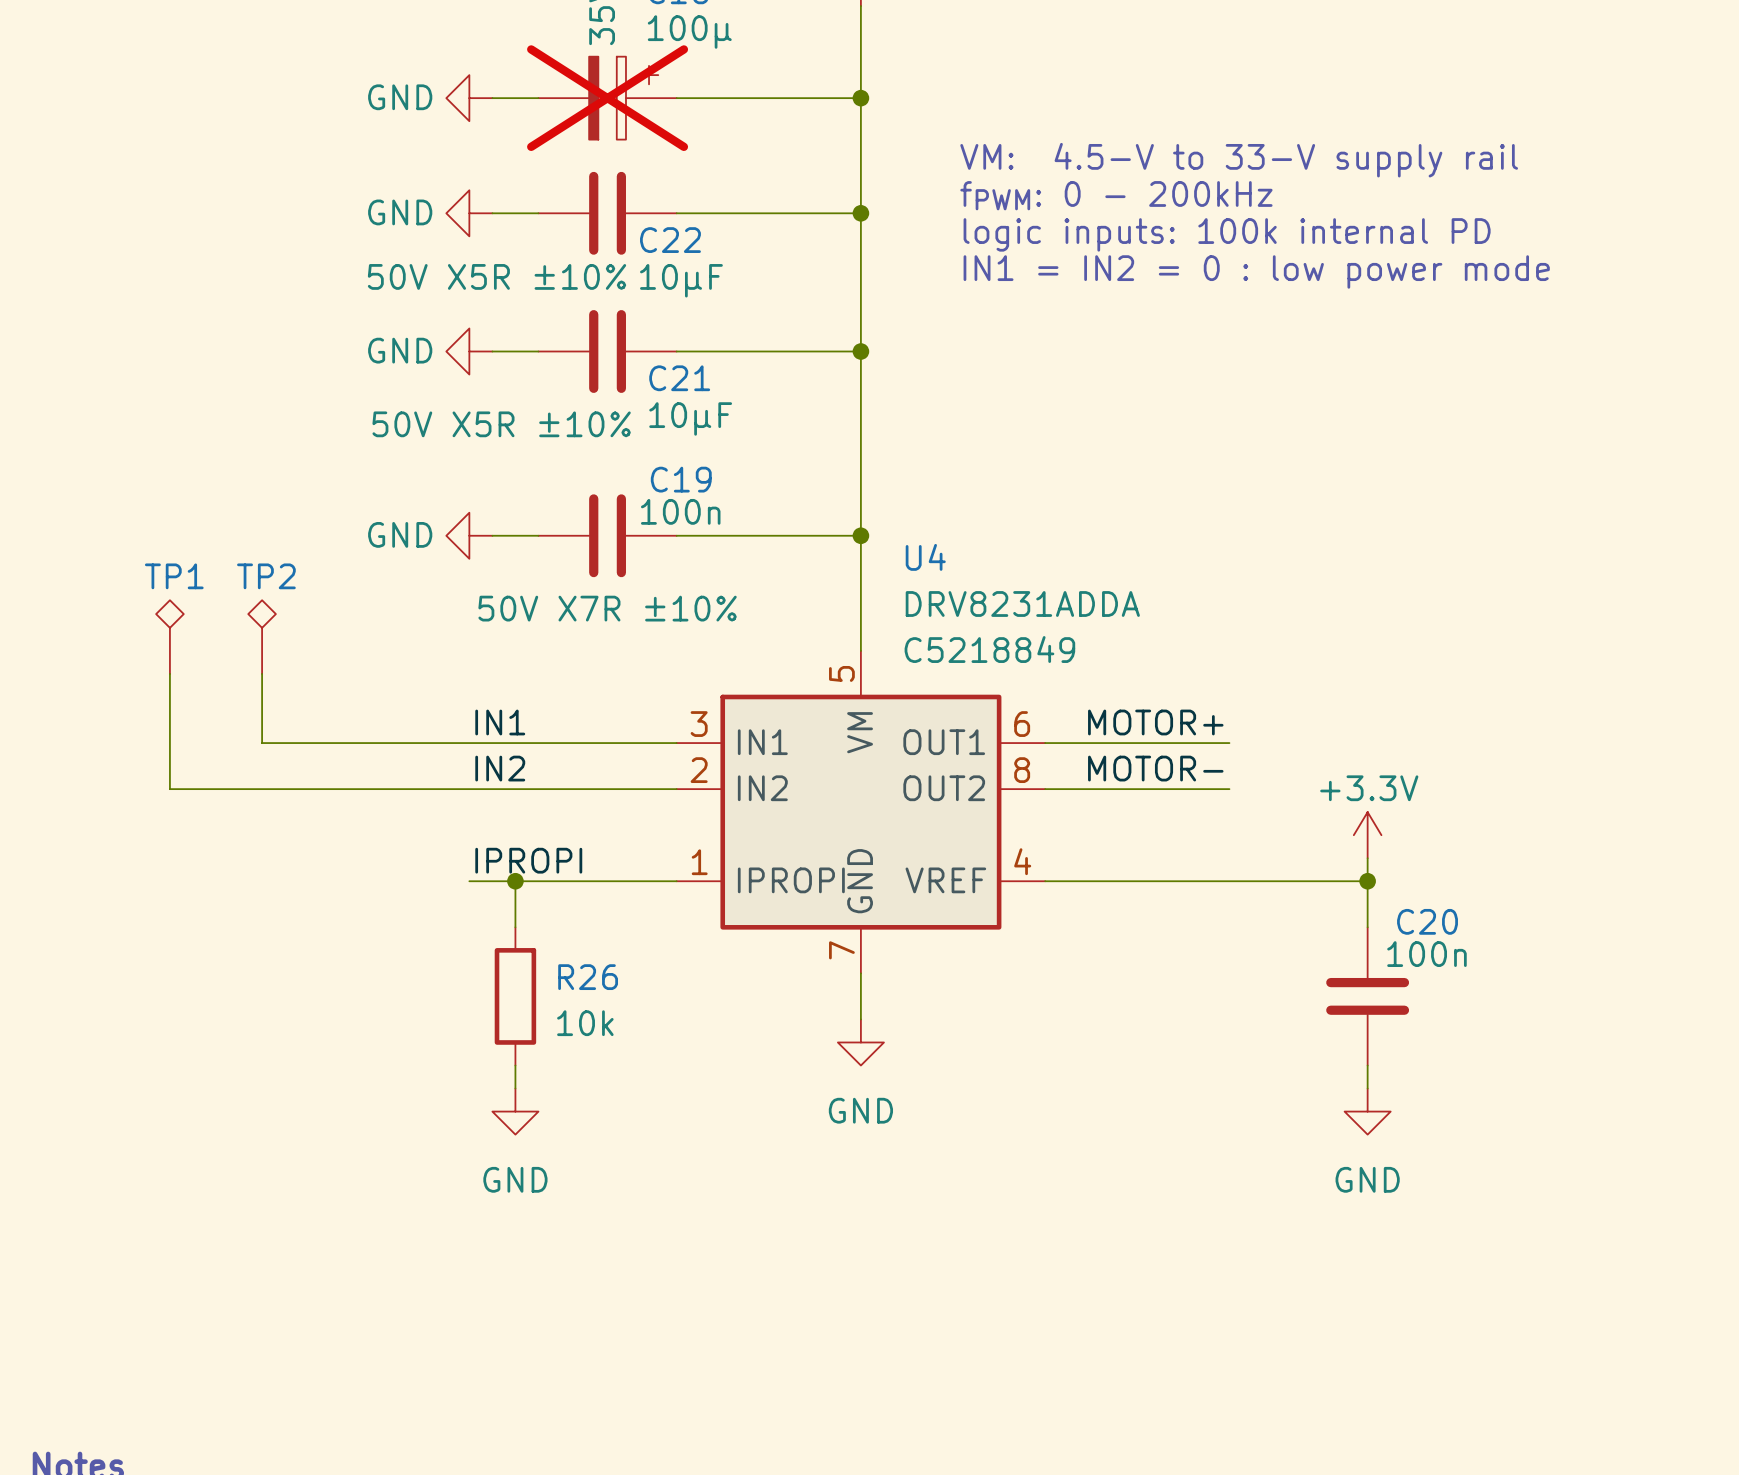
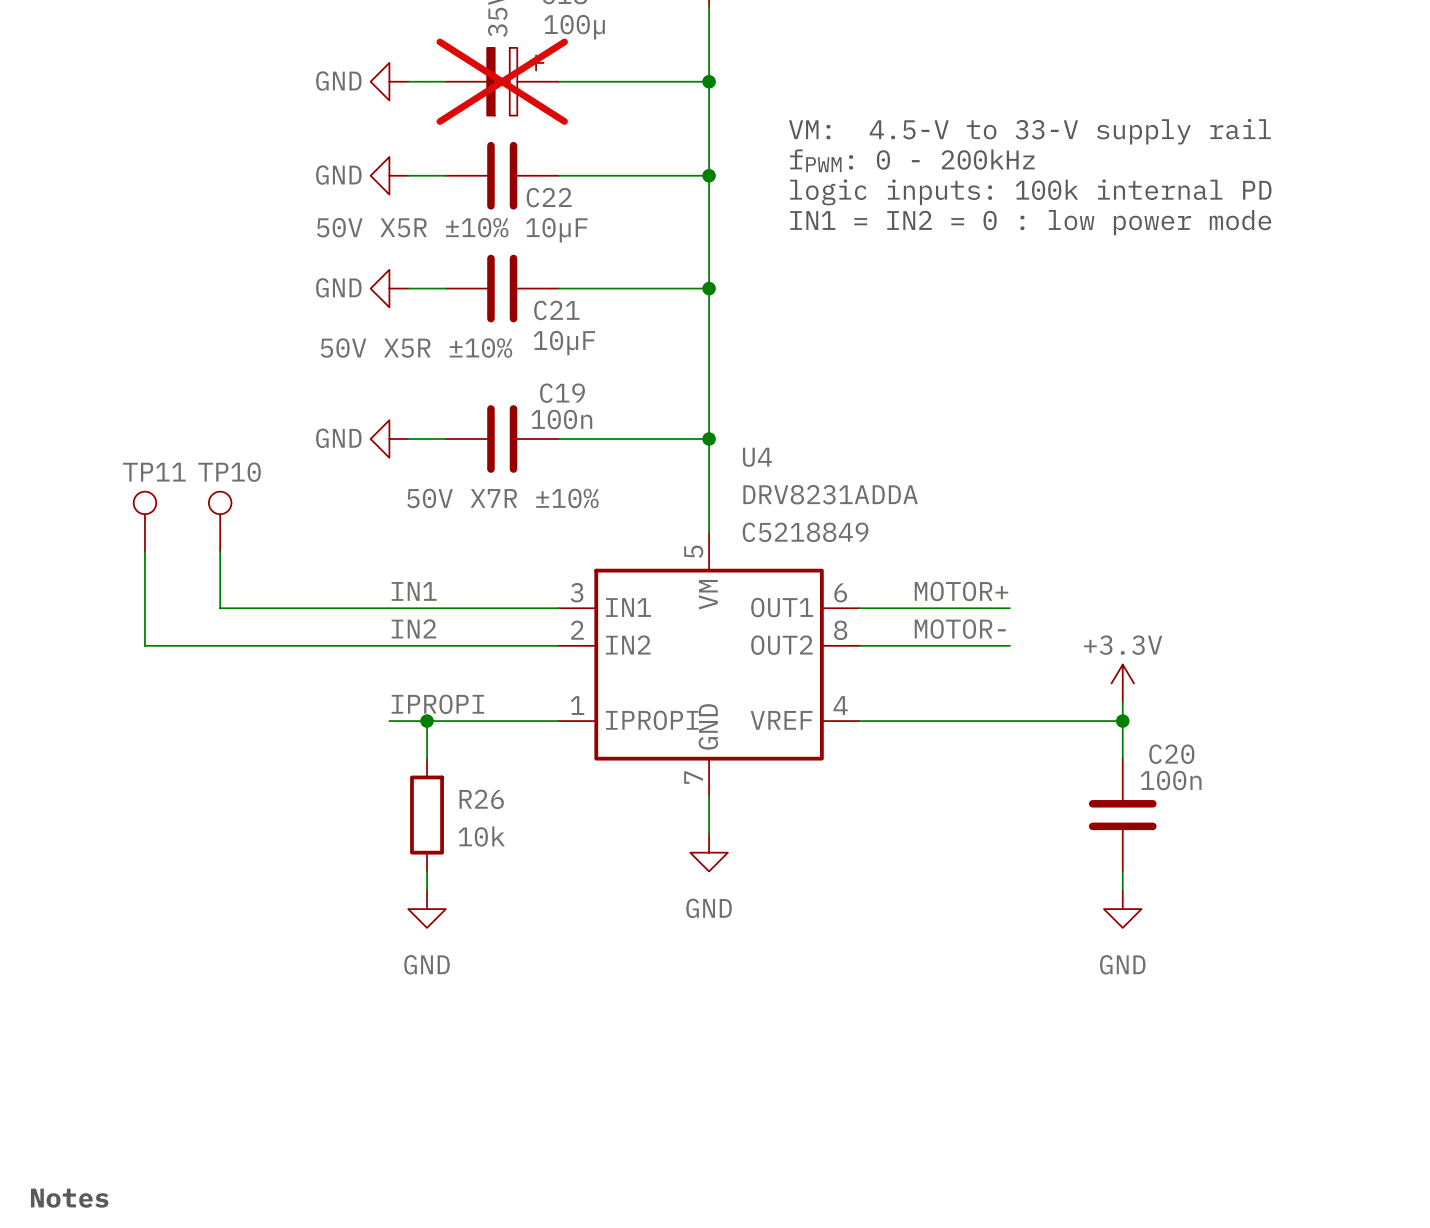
TP1: (169, 637) -> none
TP11: none -> (144, 521)
TP2: (262, 637) -> none
TP10: none -> (220, 521)

